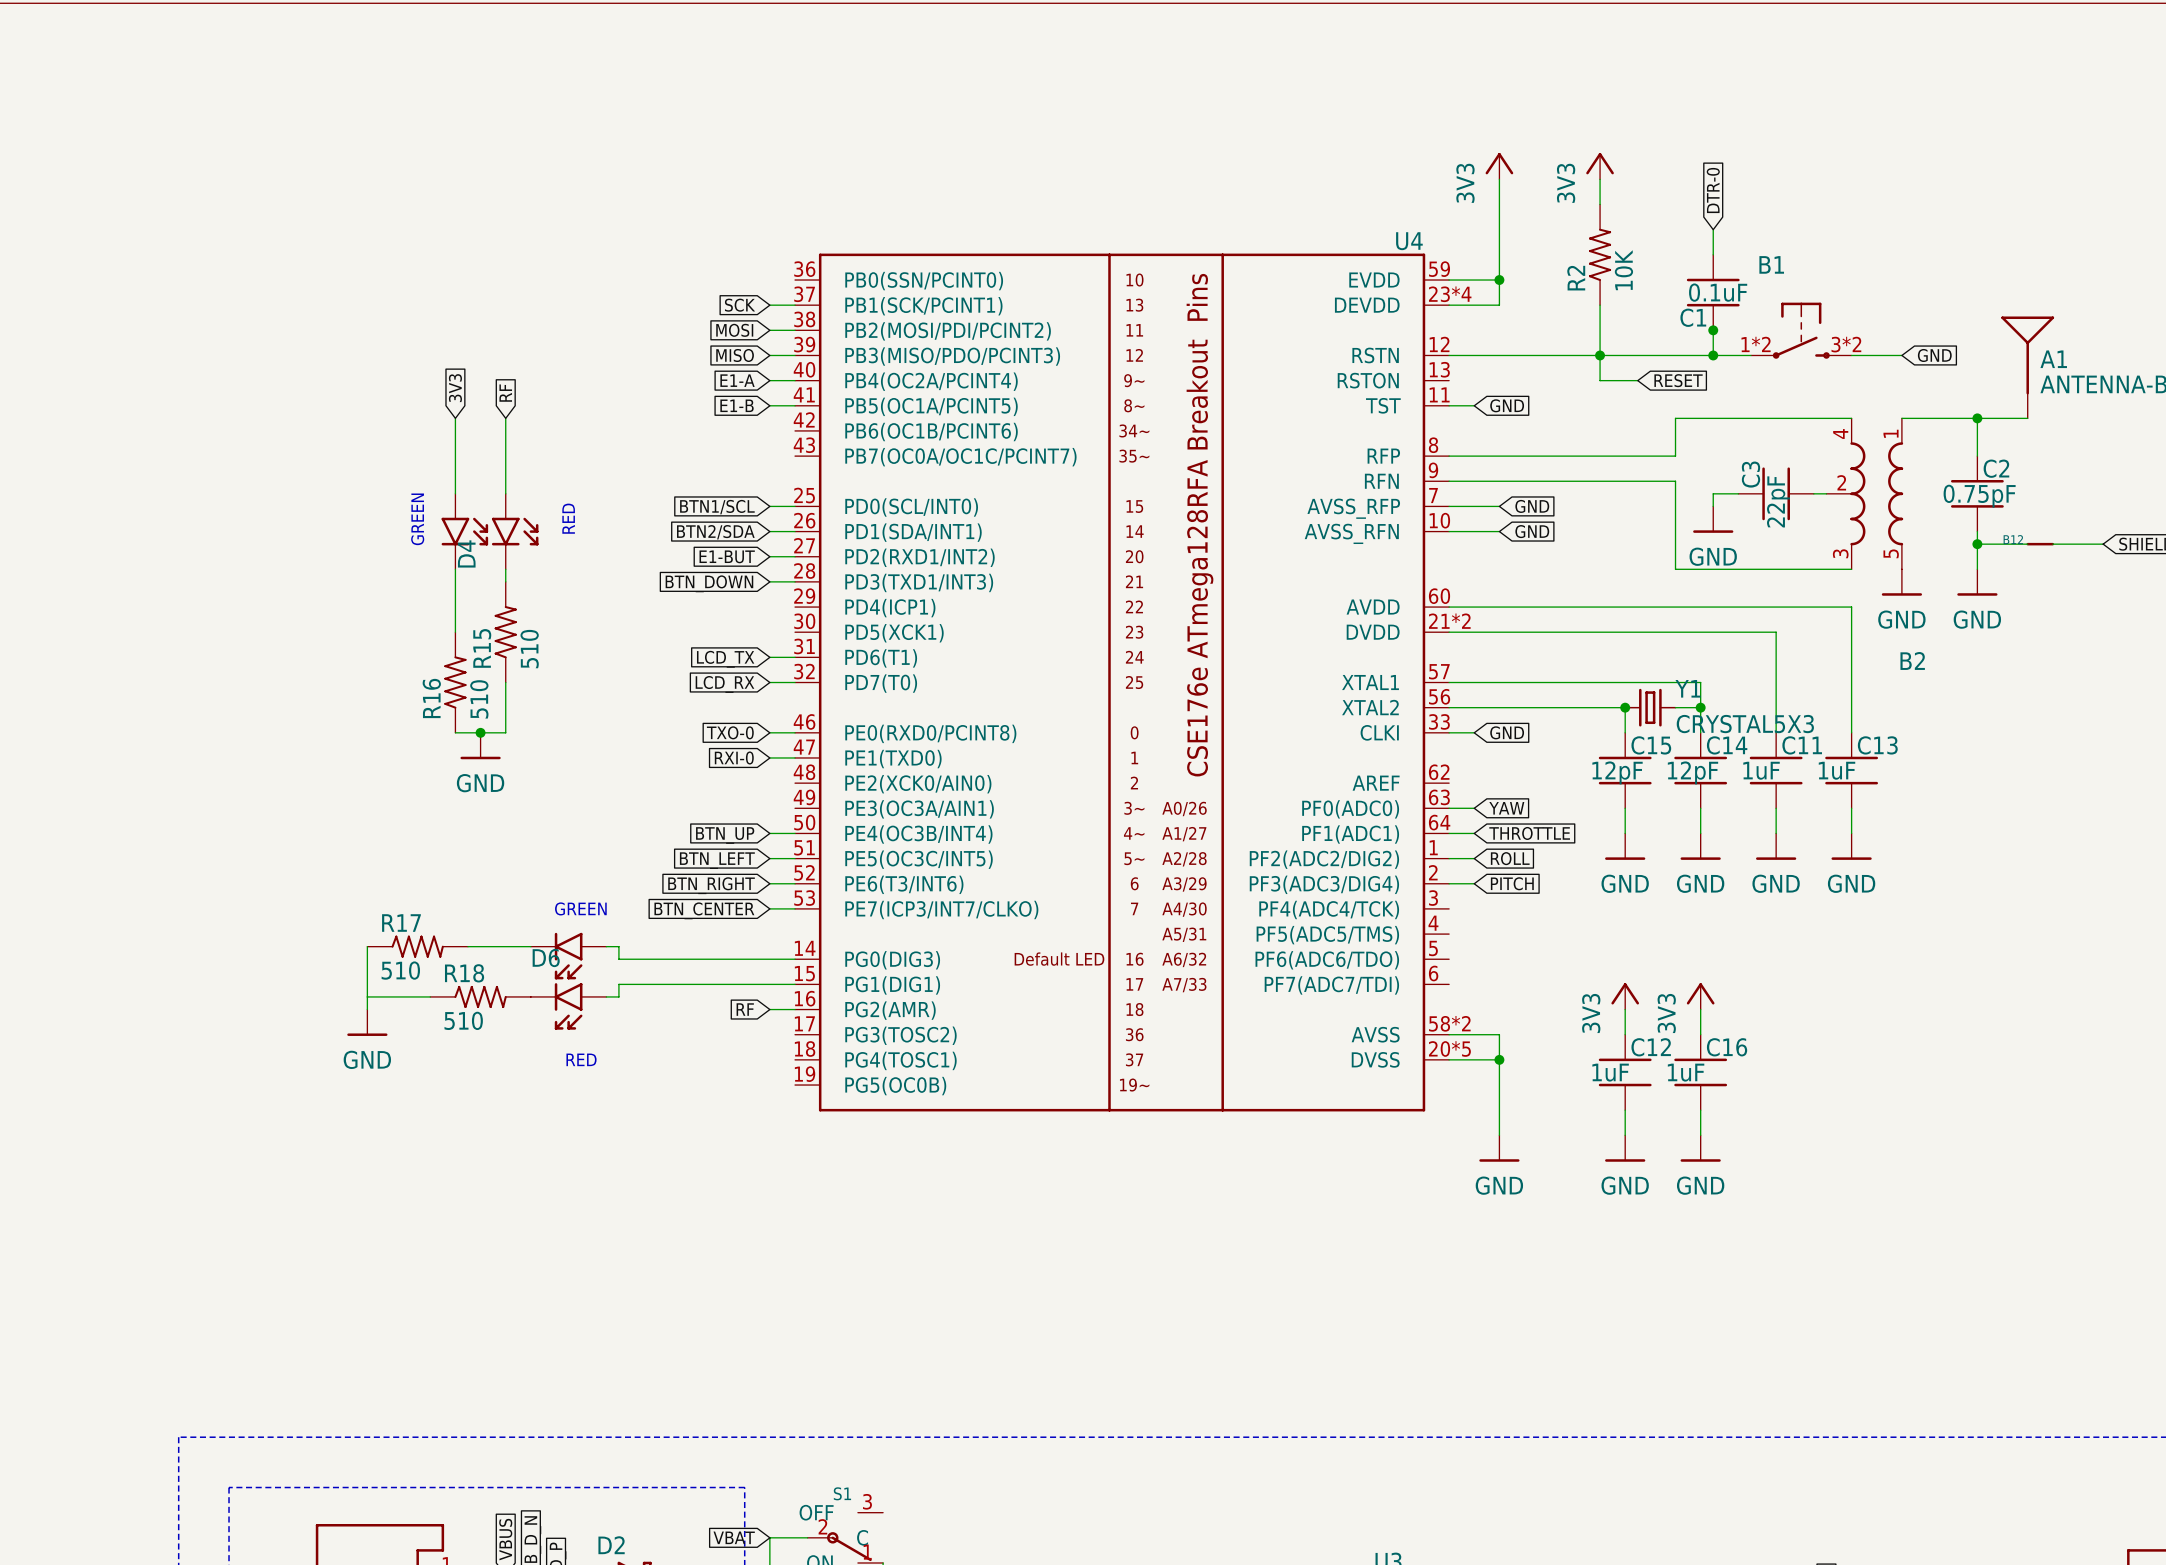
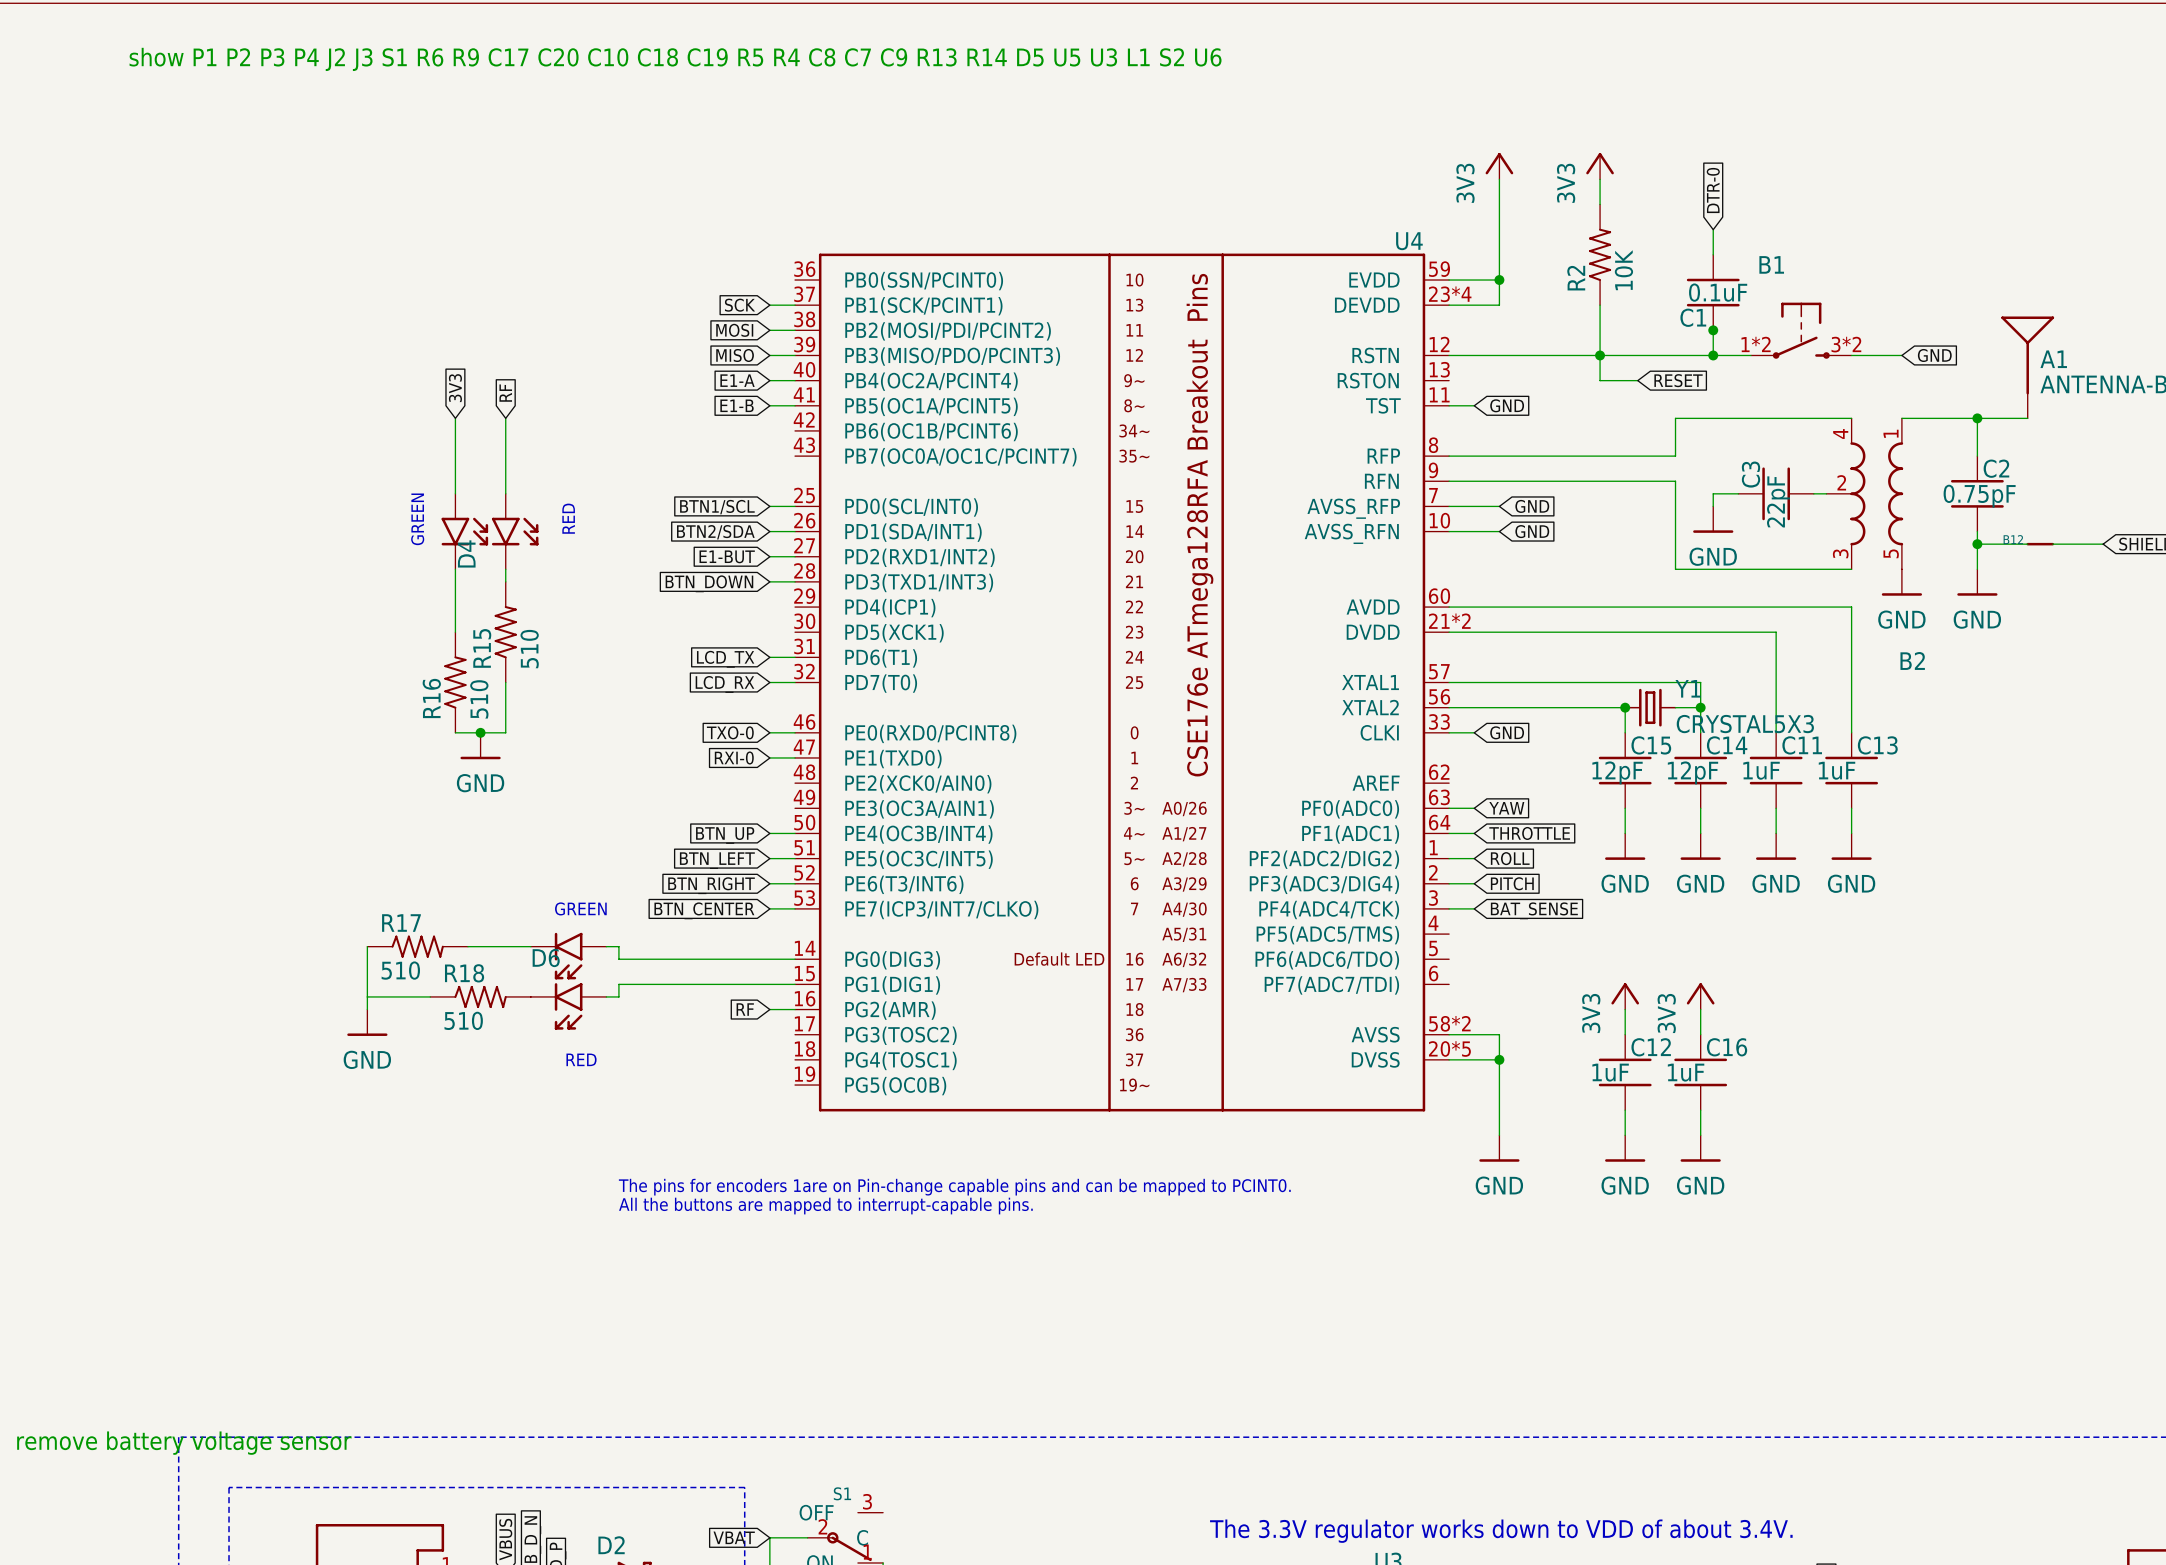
text: none -> show P1 P2 P3 P4 J2 J3 S1 R6 R9 C17 C20 C10 C18 C19 R5 R4 C8 C7 C9 R13 R14 D5 U5 U3 L1 S2 U6 (675, 59)
wire: none -> (1449, 908) (1474, 908)
global label: none -> BAT_SENSE (1534, 910)
text: none -> The pins for encoders 1are on Pin-change capable pins and can be mapped to PCINT0. (954, 1187)
text: none -> All the buttons are mapped to interrupt-capable pins. (825, 1206)
text: none -> remove battery voltage sensor (184, 1443)
text: none -> The 3.3V regulator works down to VDD of about 3.4V. (1501, 1531)

